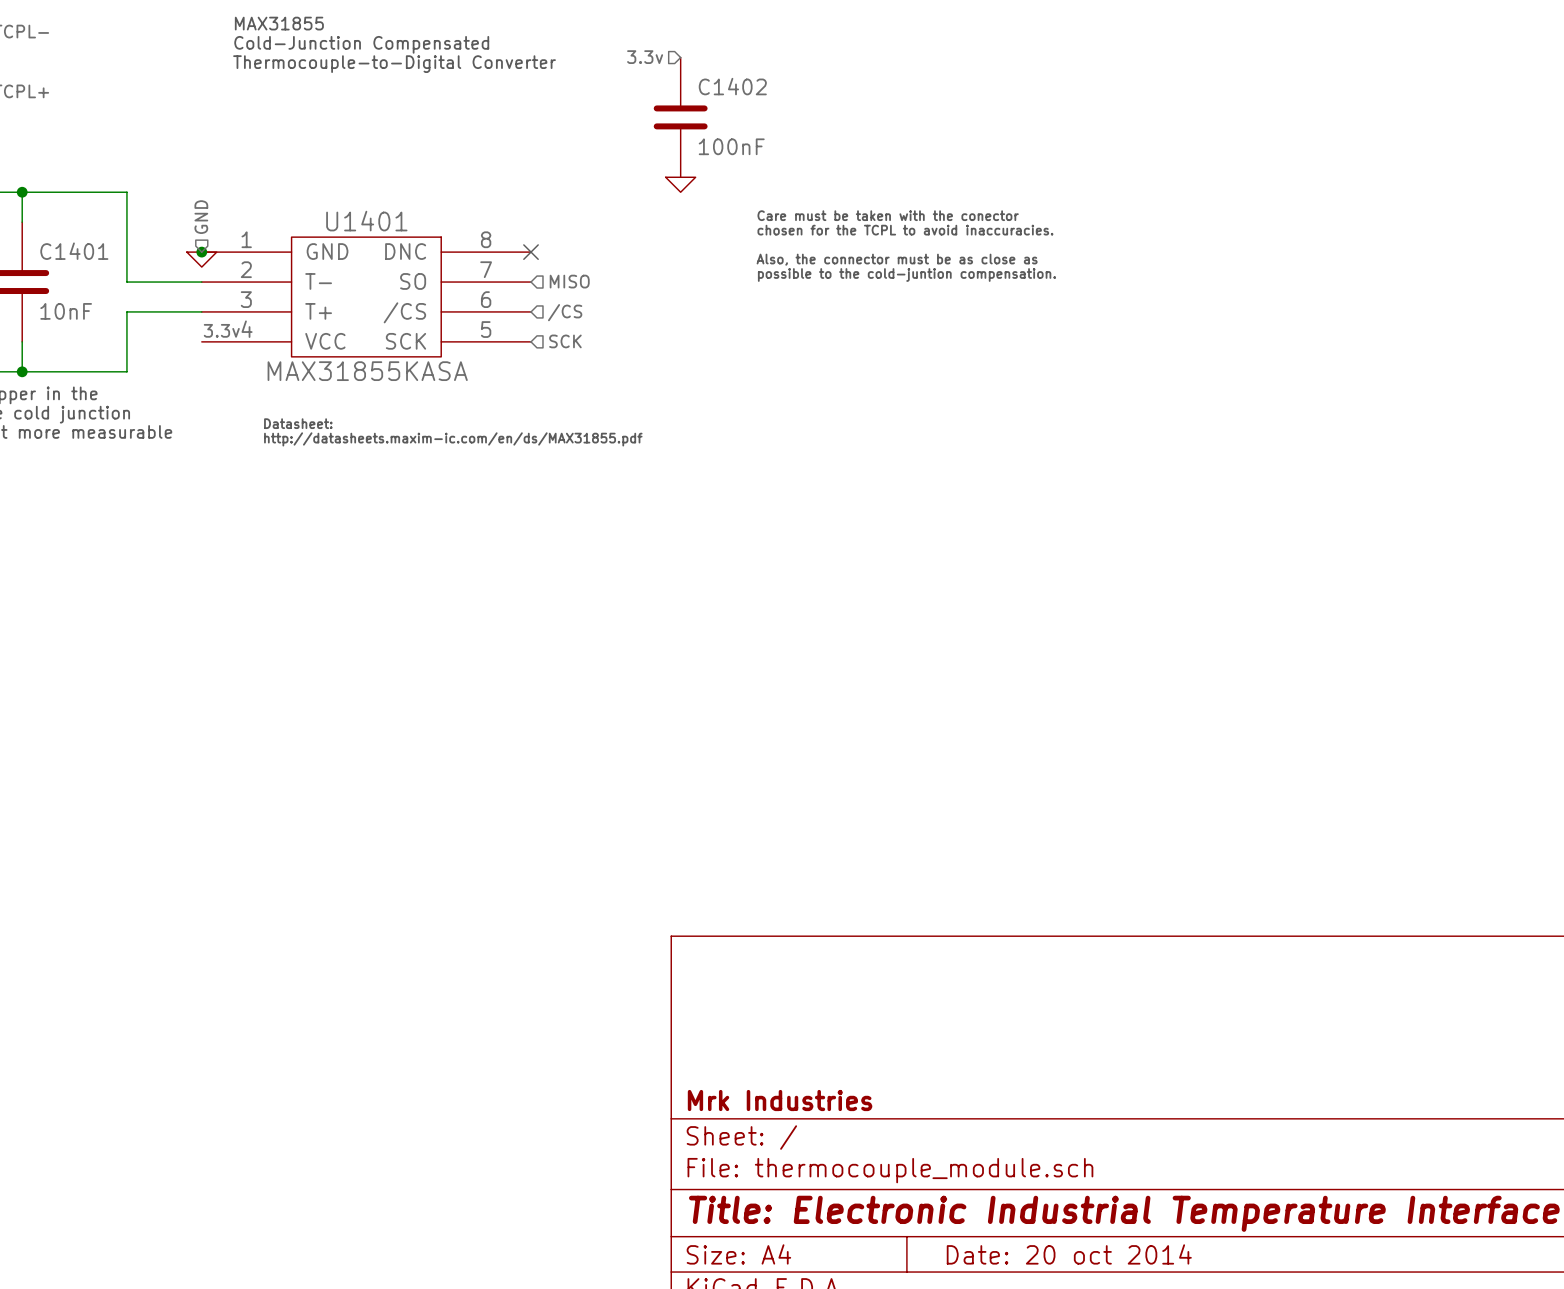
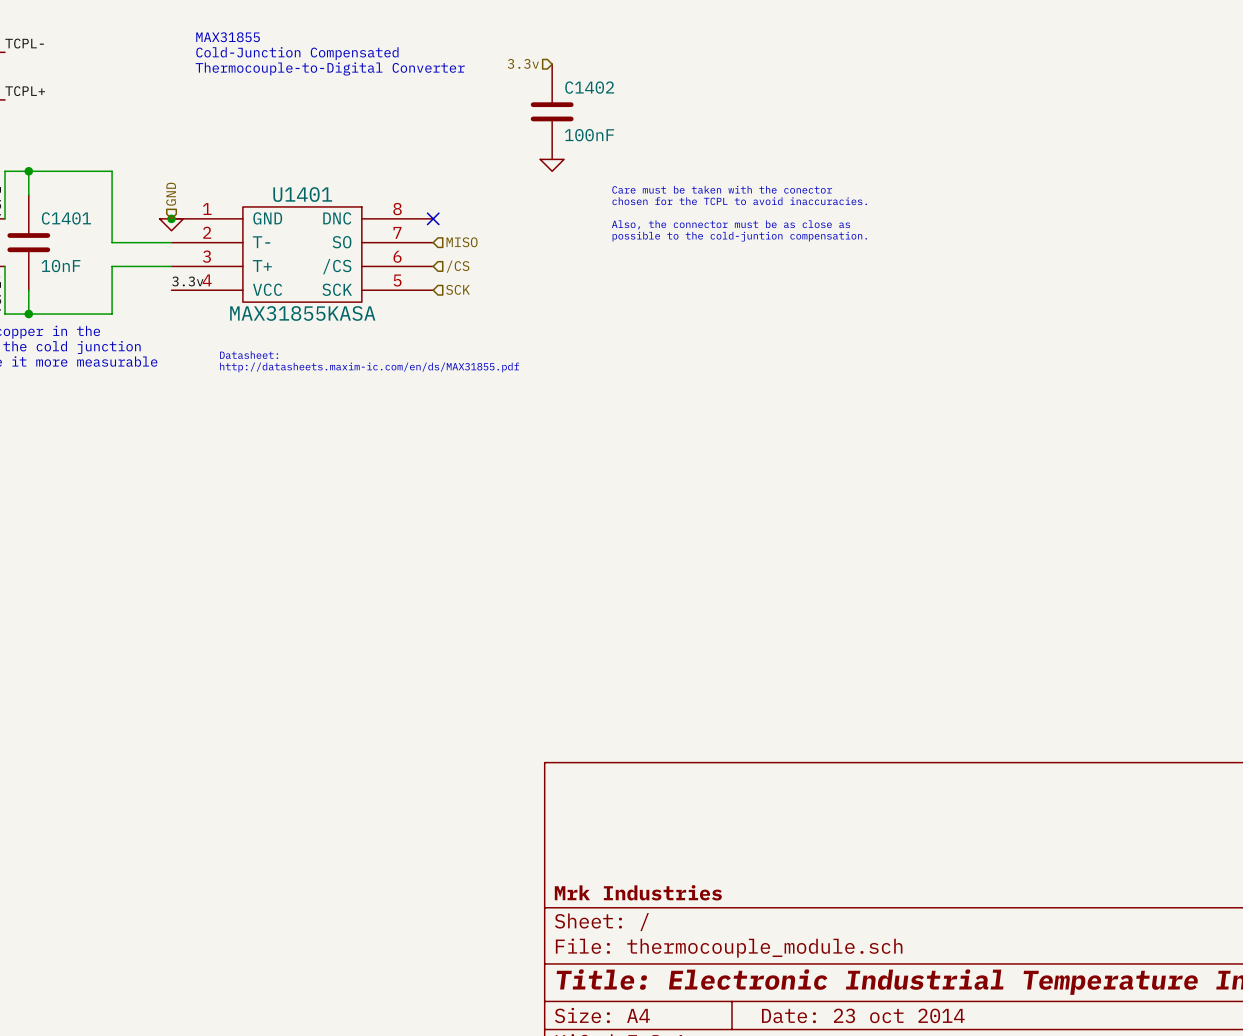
title block: Date: 20 oct 2014 (1069, 1254) -> Date: 23 oct 2014 (863, 1015)

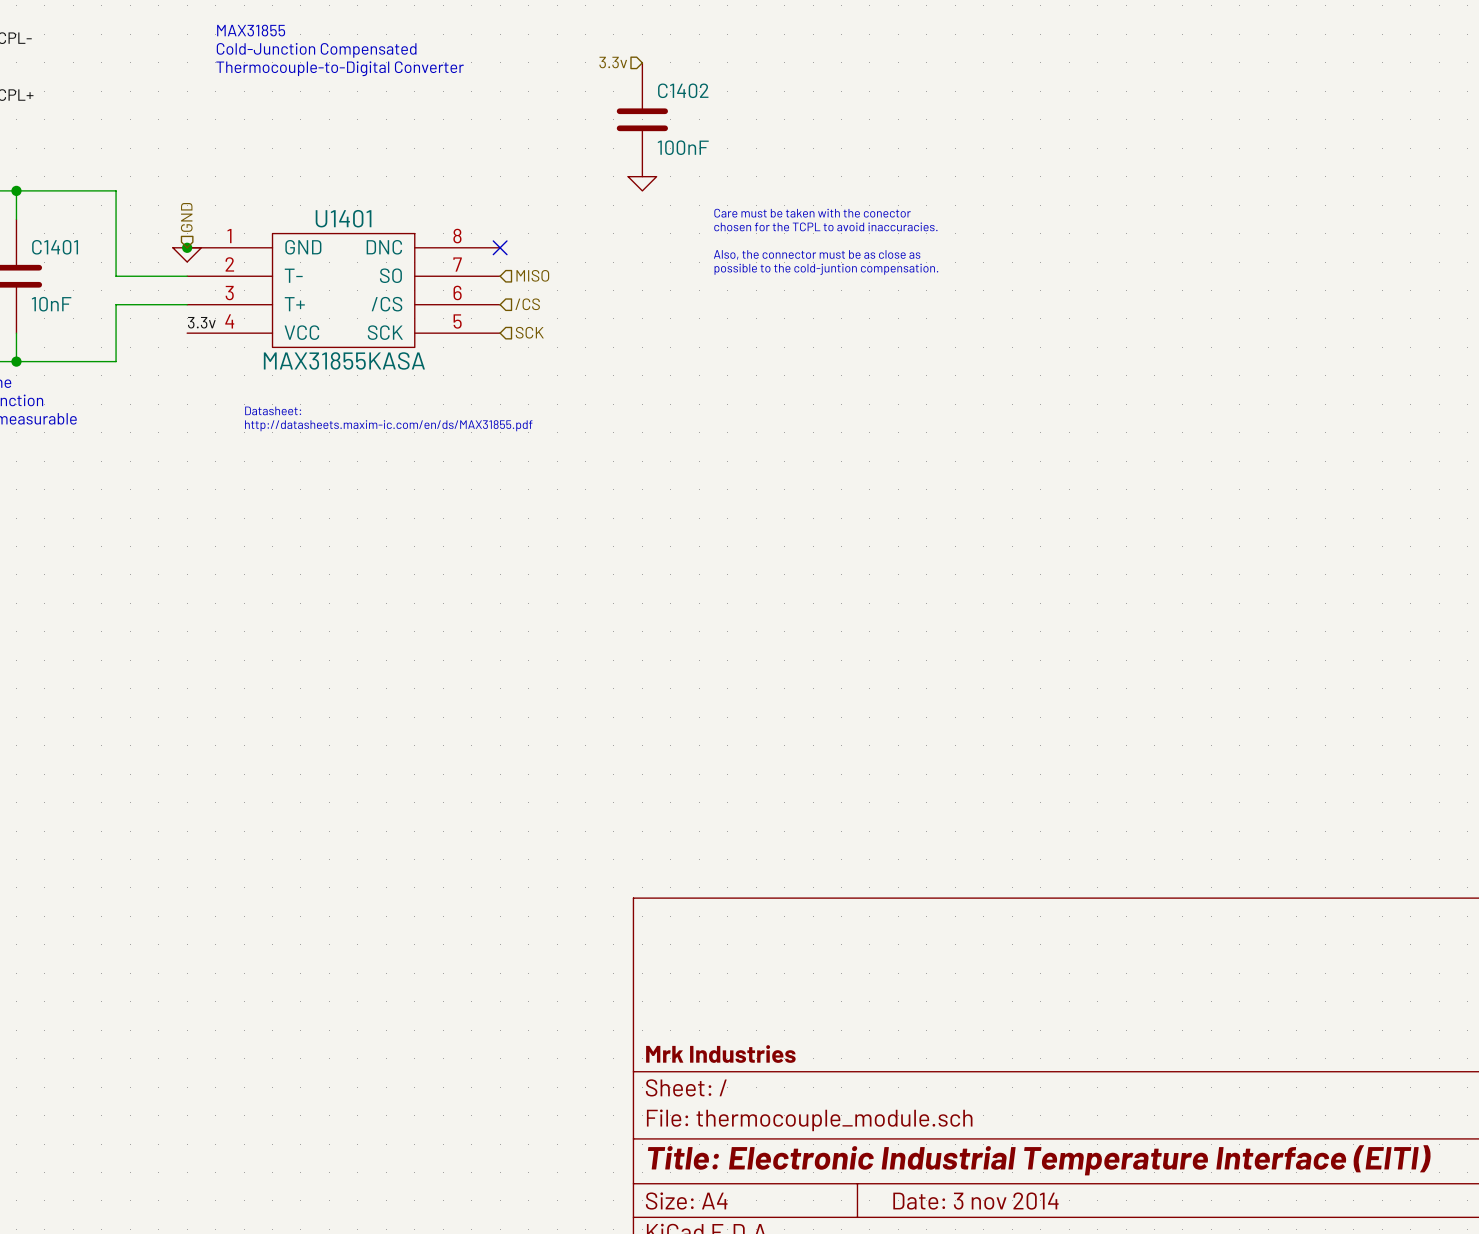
title block: Date: 23 oct 2014 (863, 1015) -> Date: 3 nov 2014 (975, 1201)

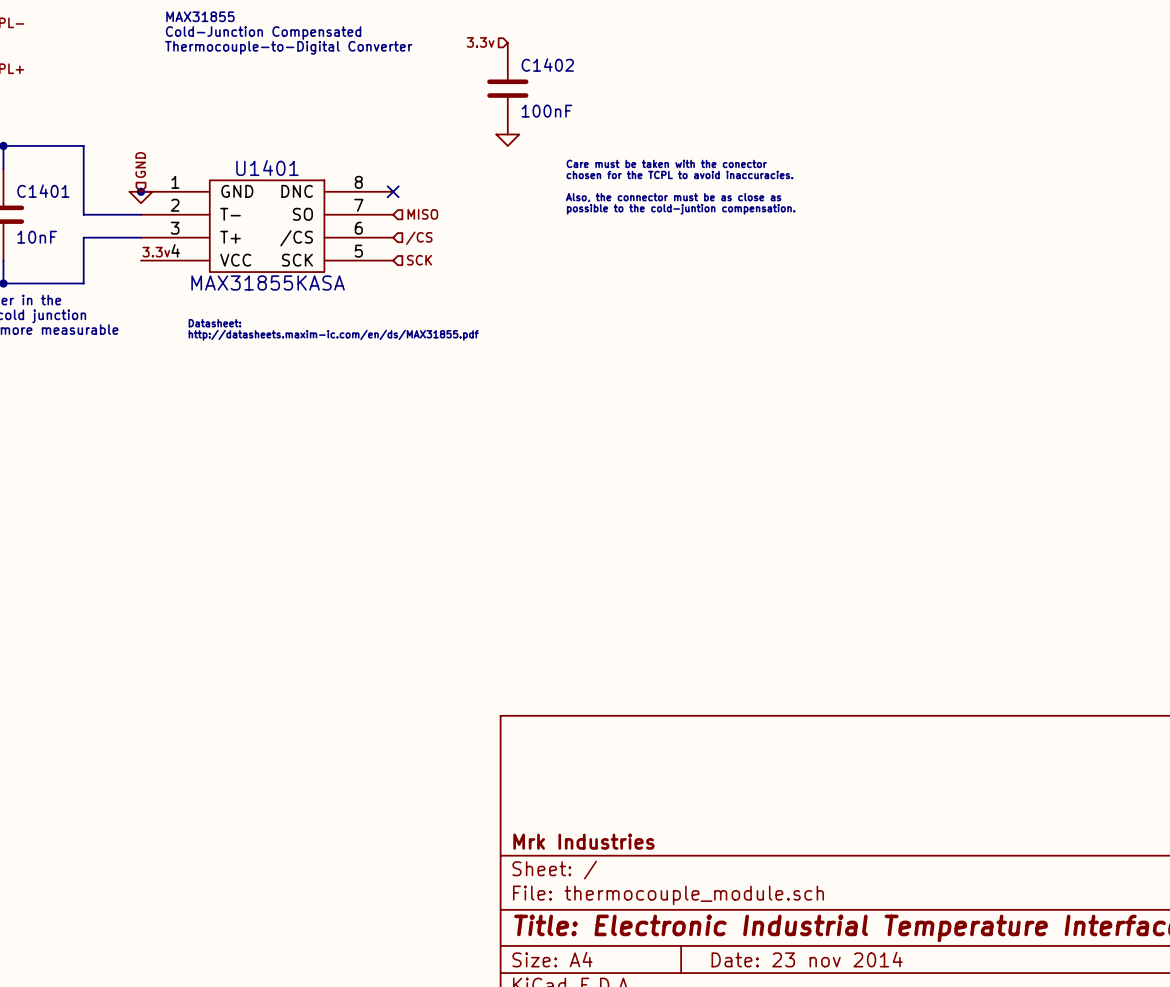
title block: Date: 3 nov 2014 (975, 1201) -> Date: 23 nov 2014 (807, 959)

